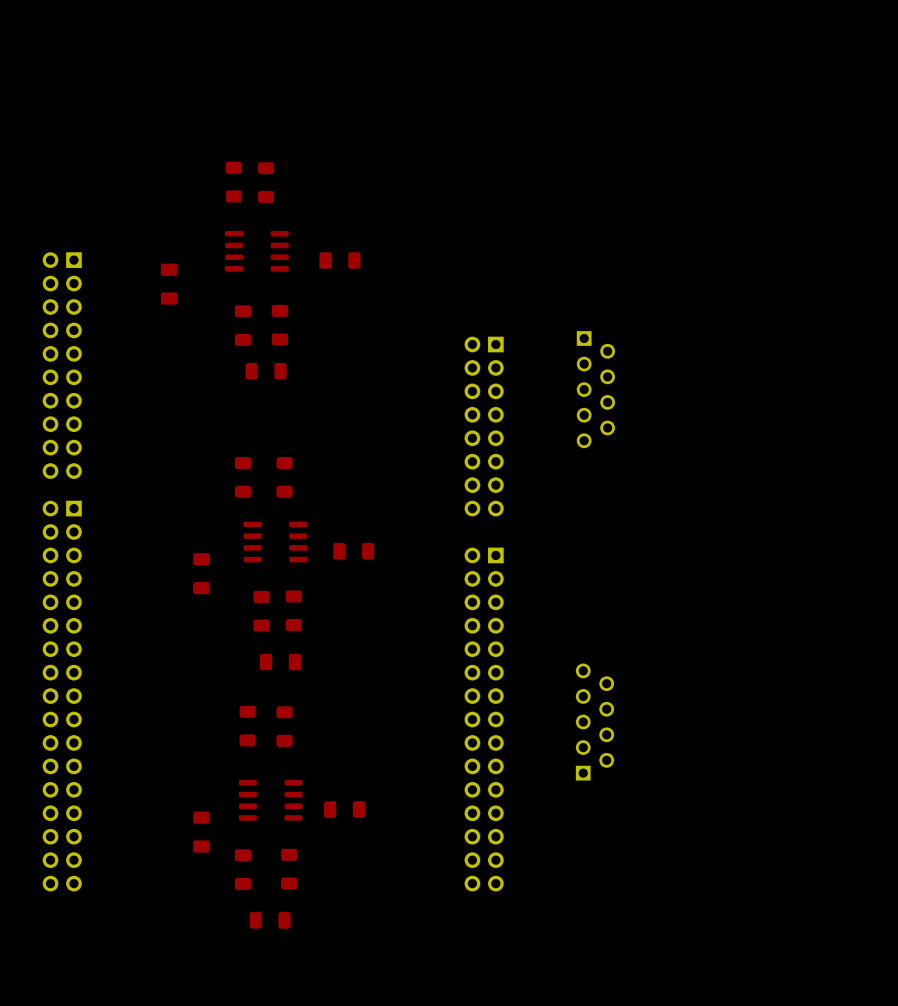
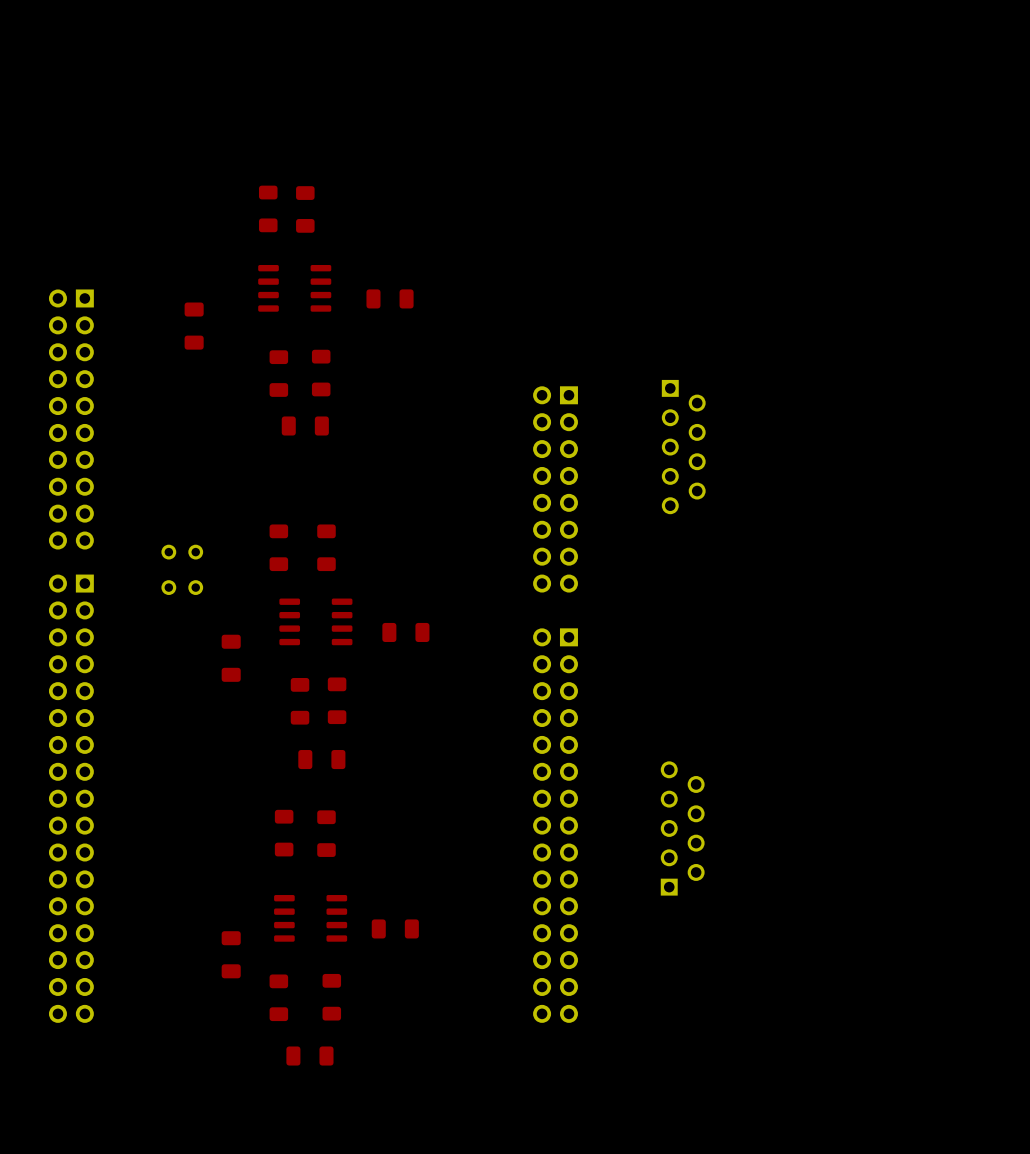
part: none -> (182, 552)
part: none -> (182, 587)

